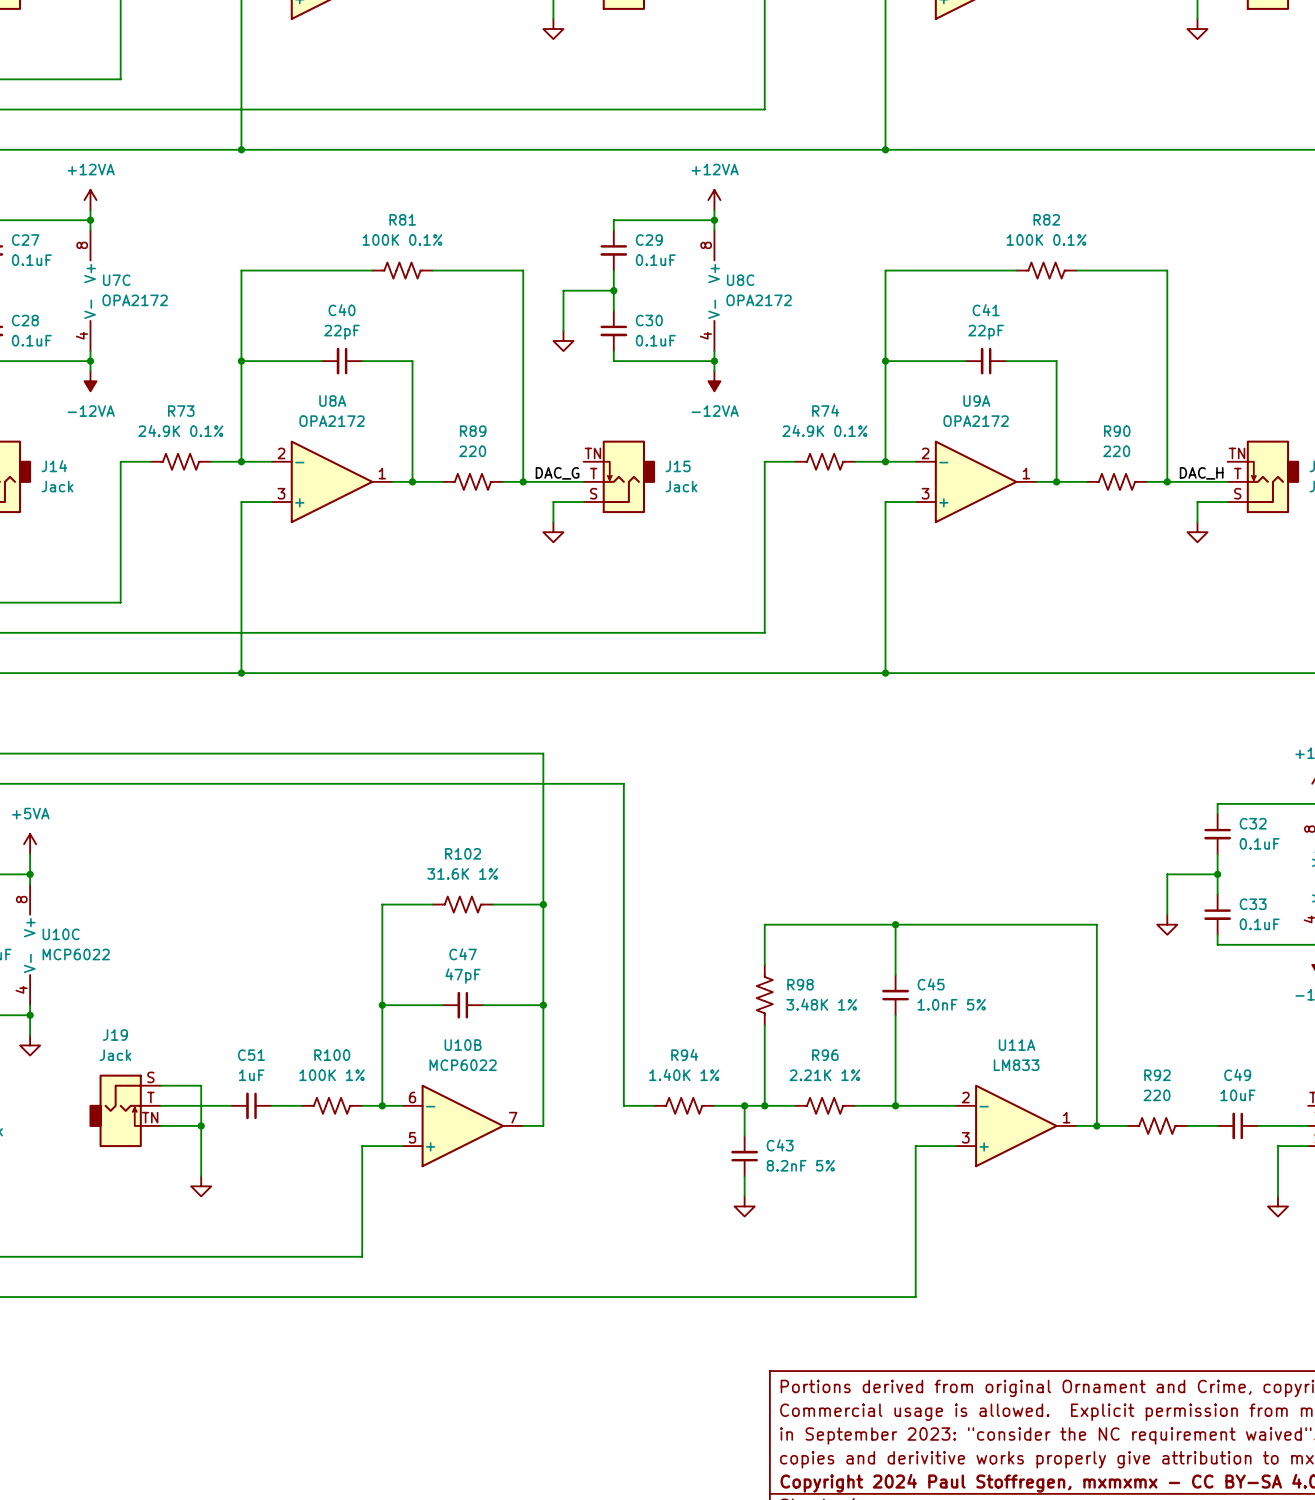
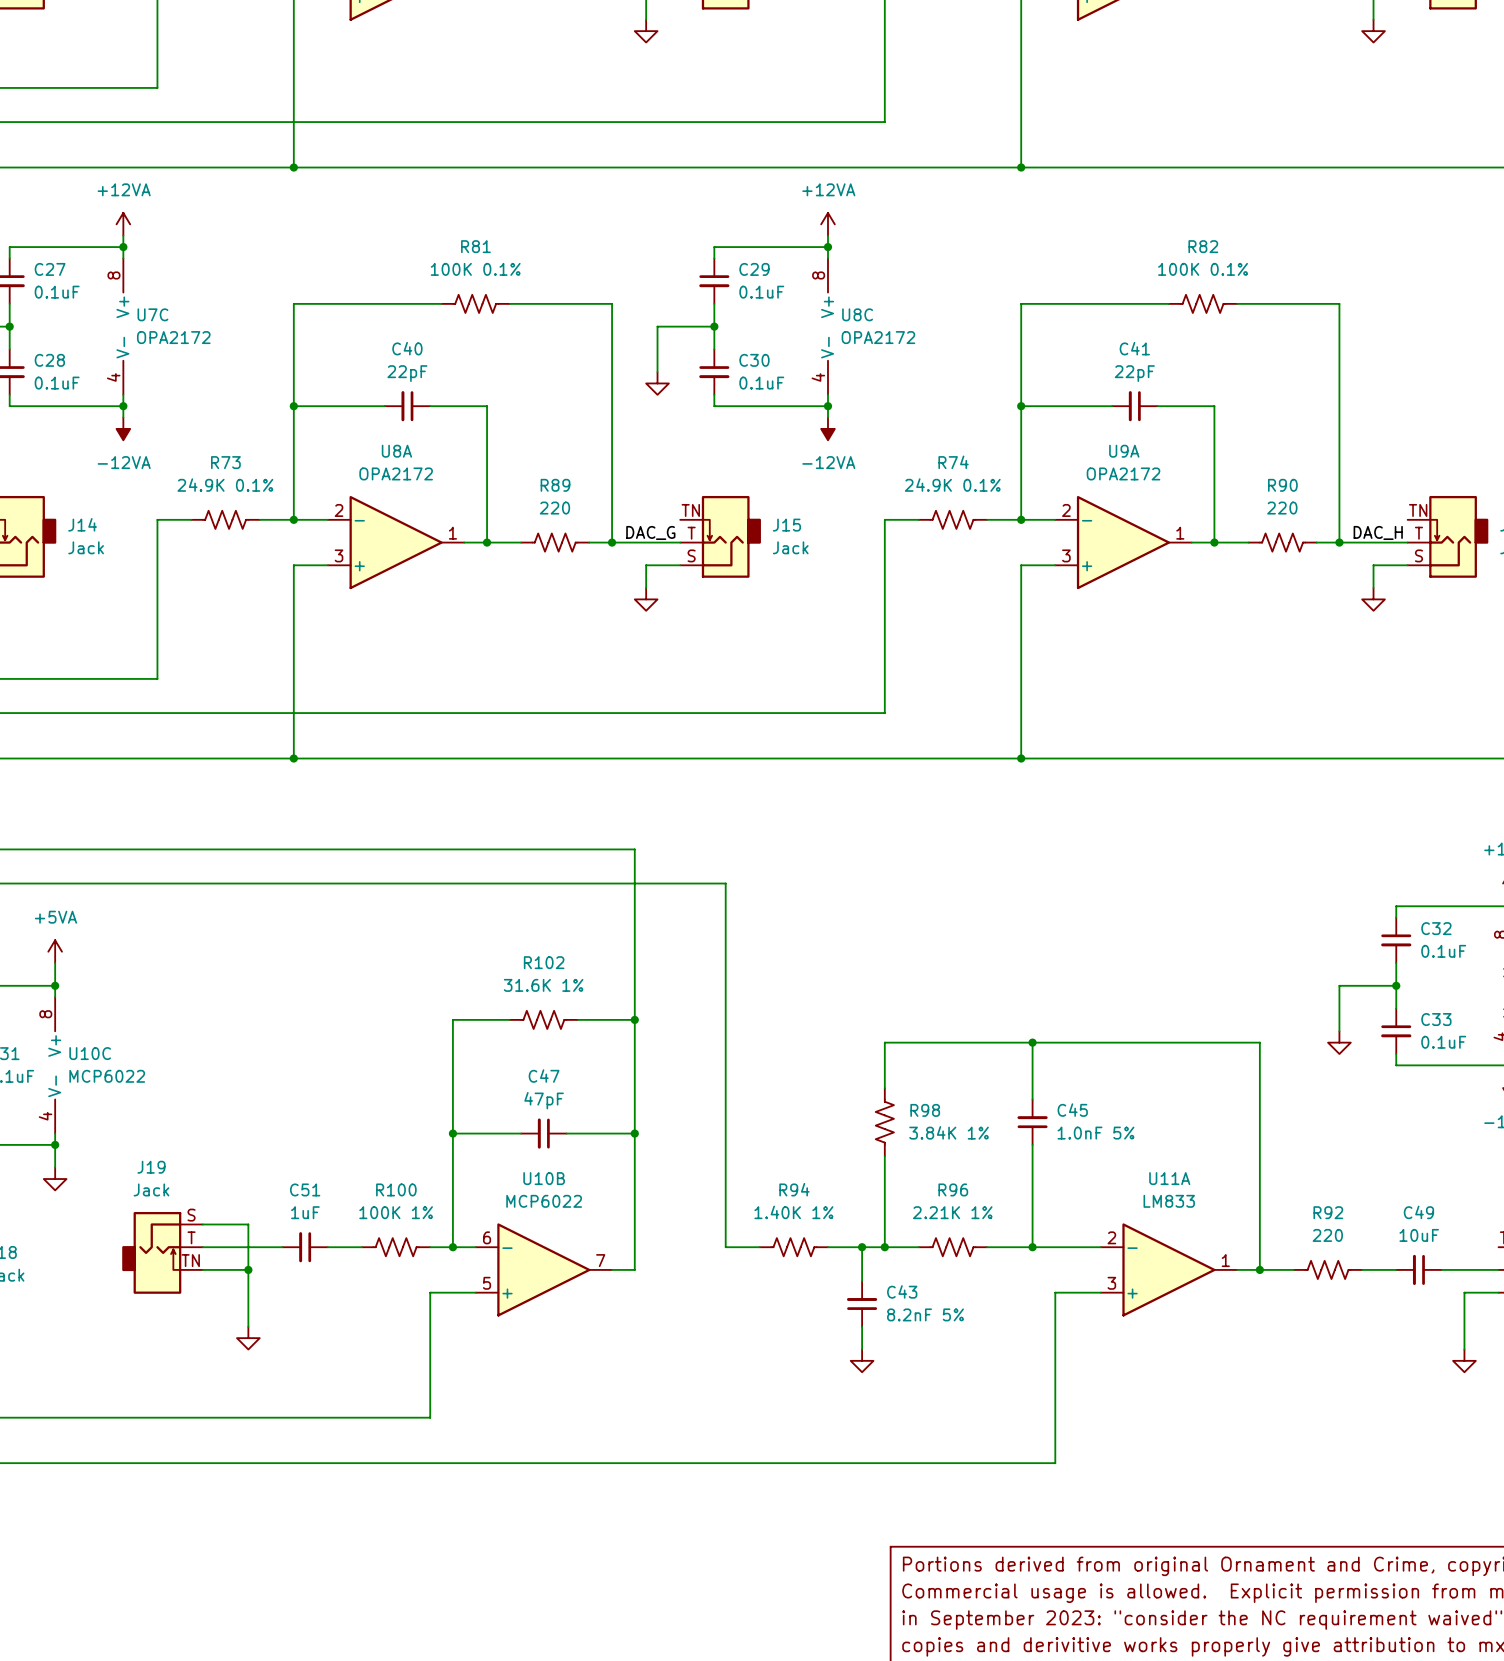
R98 value: 3.48K 1% (821, 1004) -> 3.84K 1% (949, 1132)

